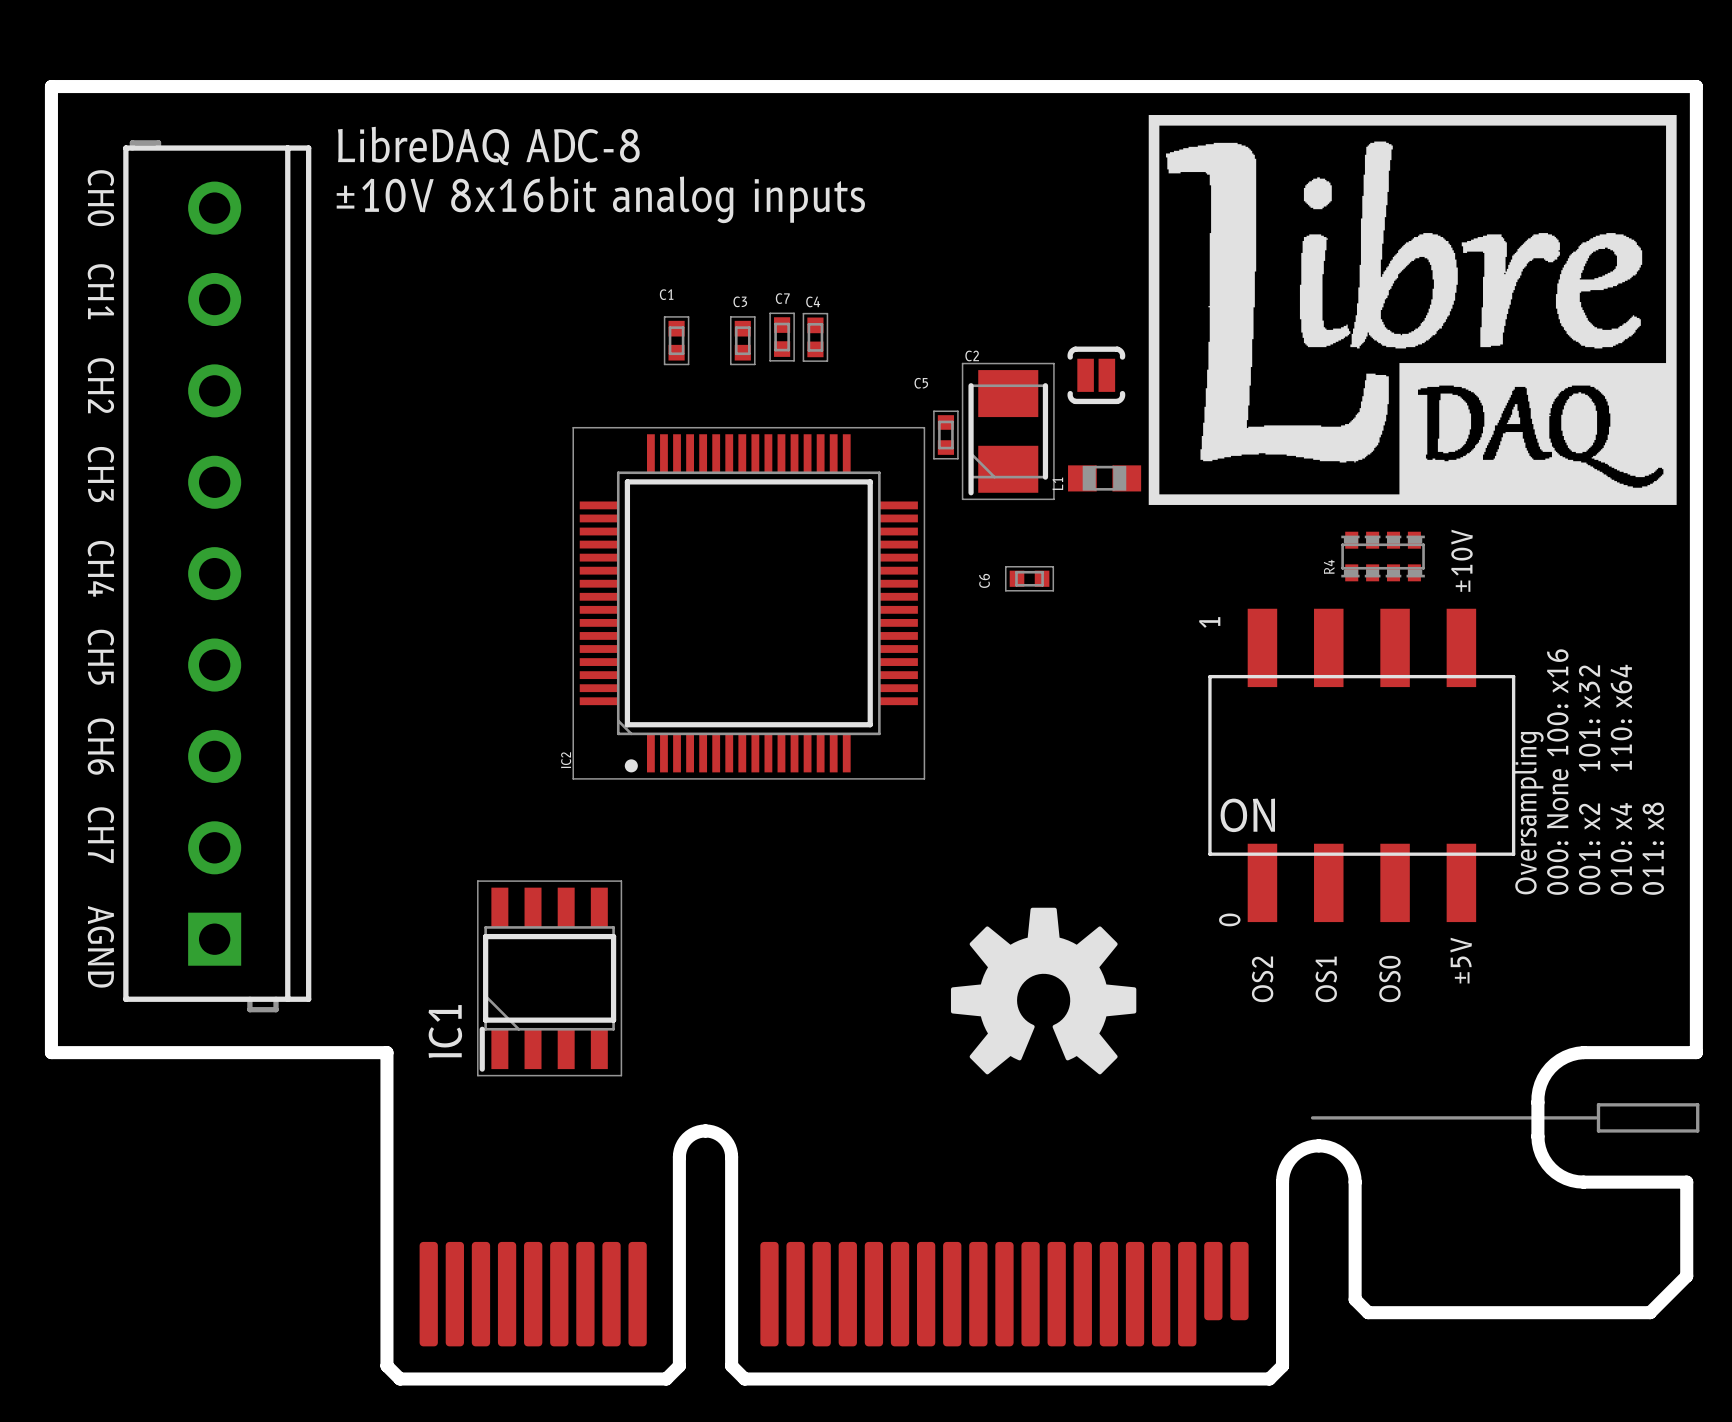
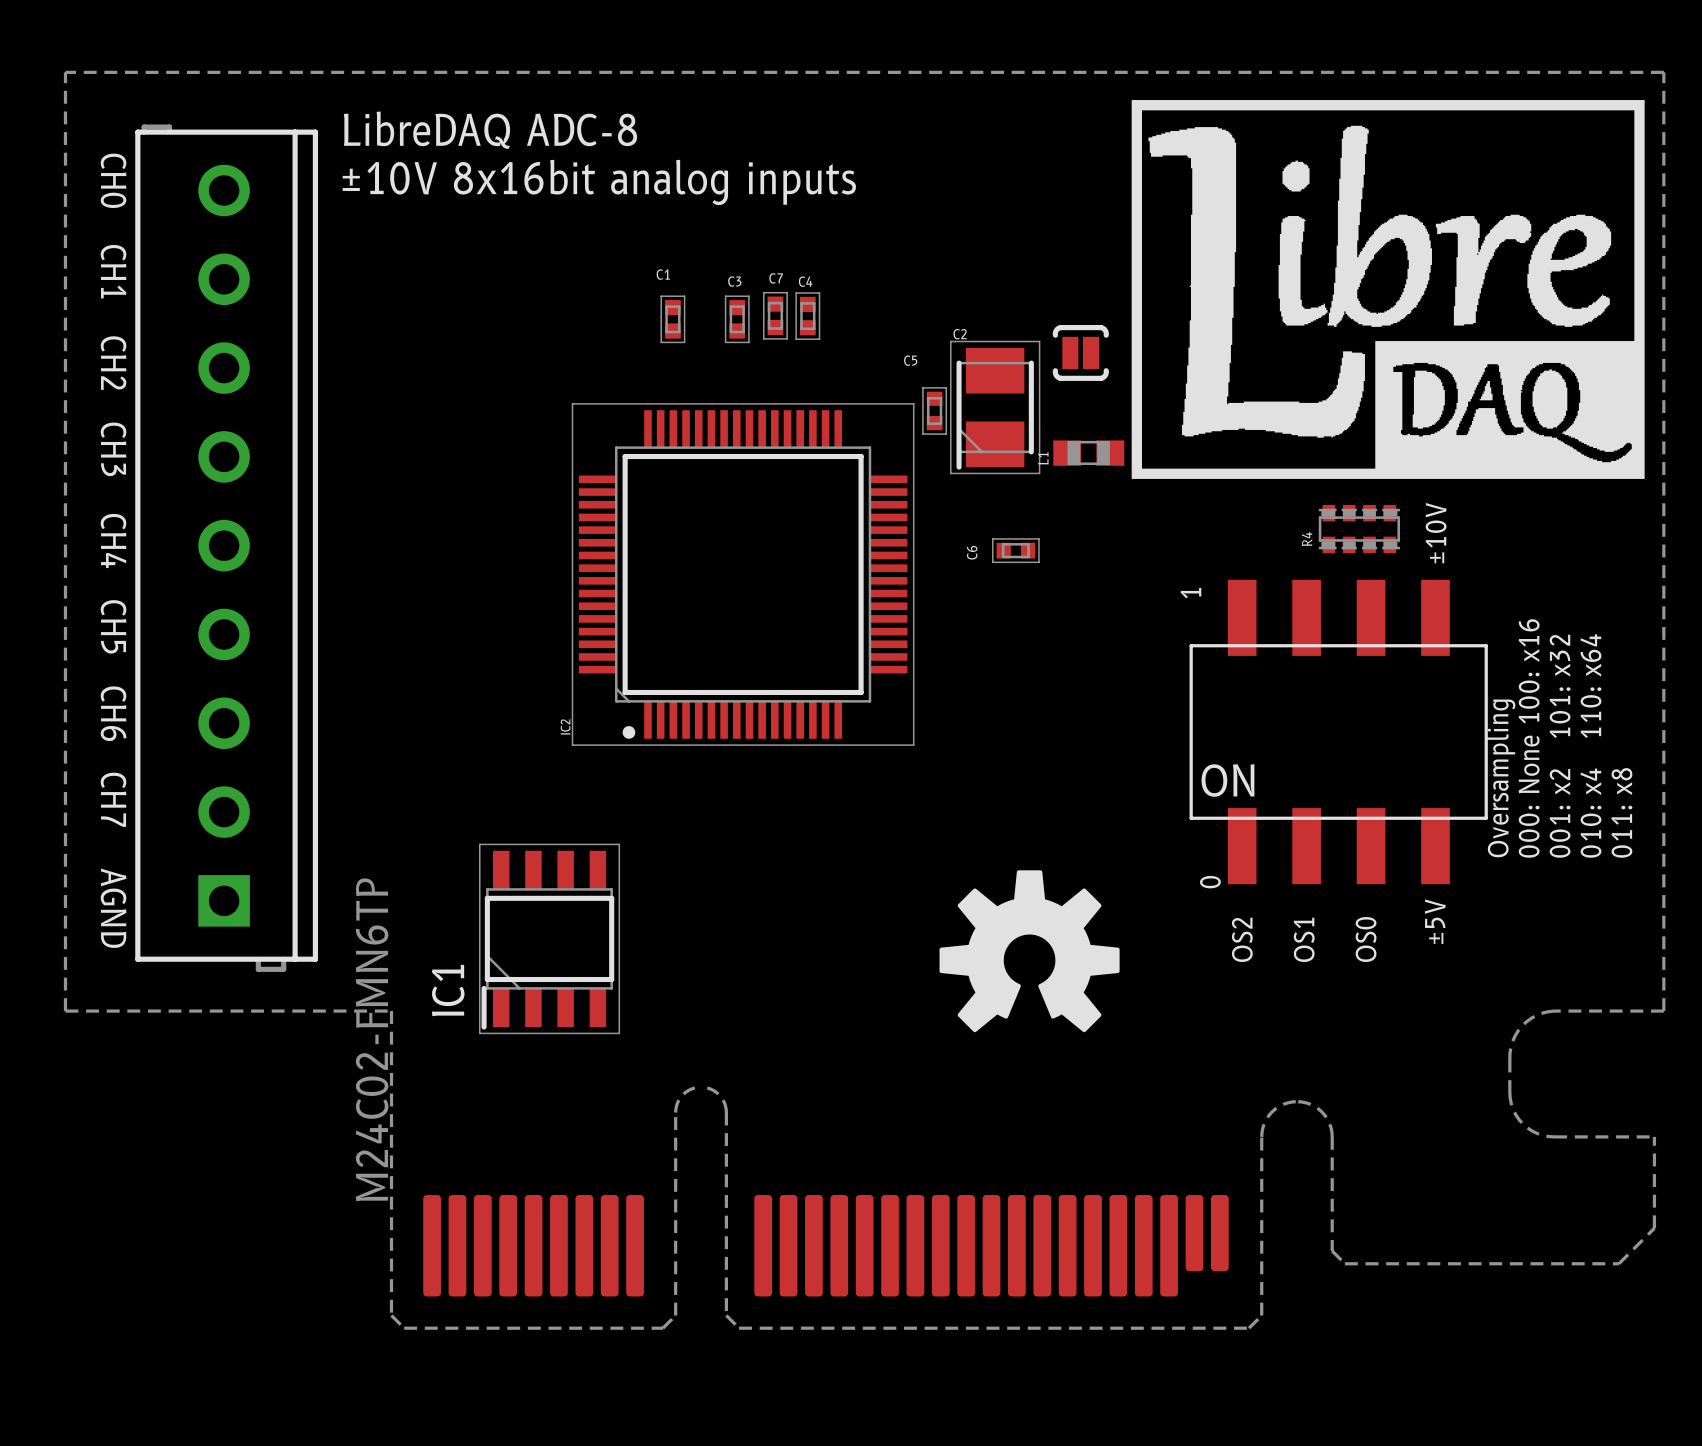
part footprint: [44, 80, 1703, 1386] -> [63, 70, 1666, 1330]
IC1 value: none -> M24C02-FMN6TP (372, 1039)

